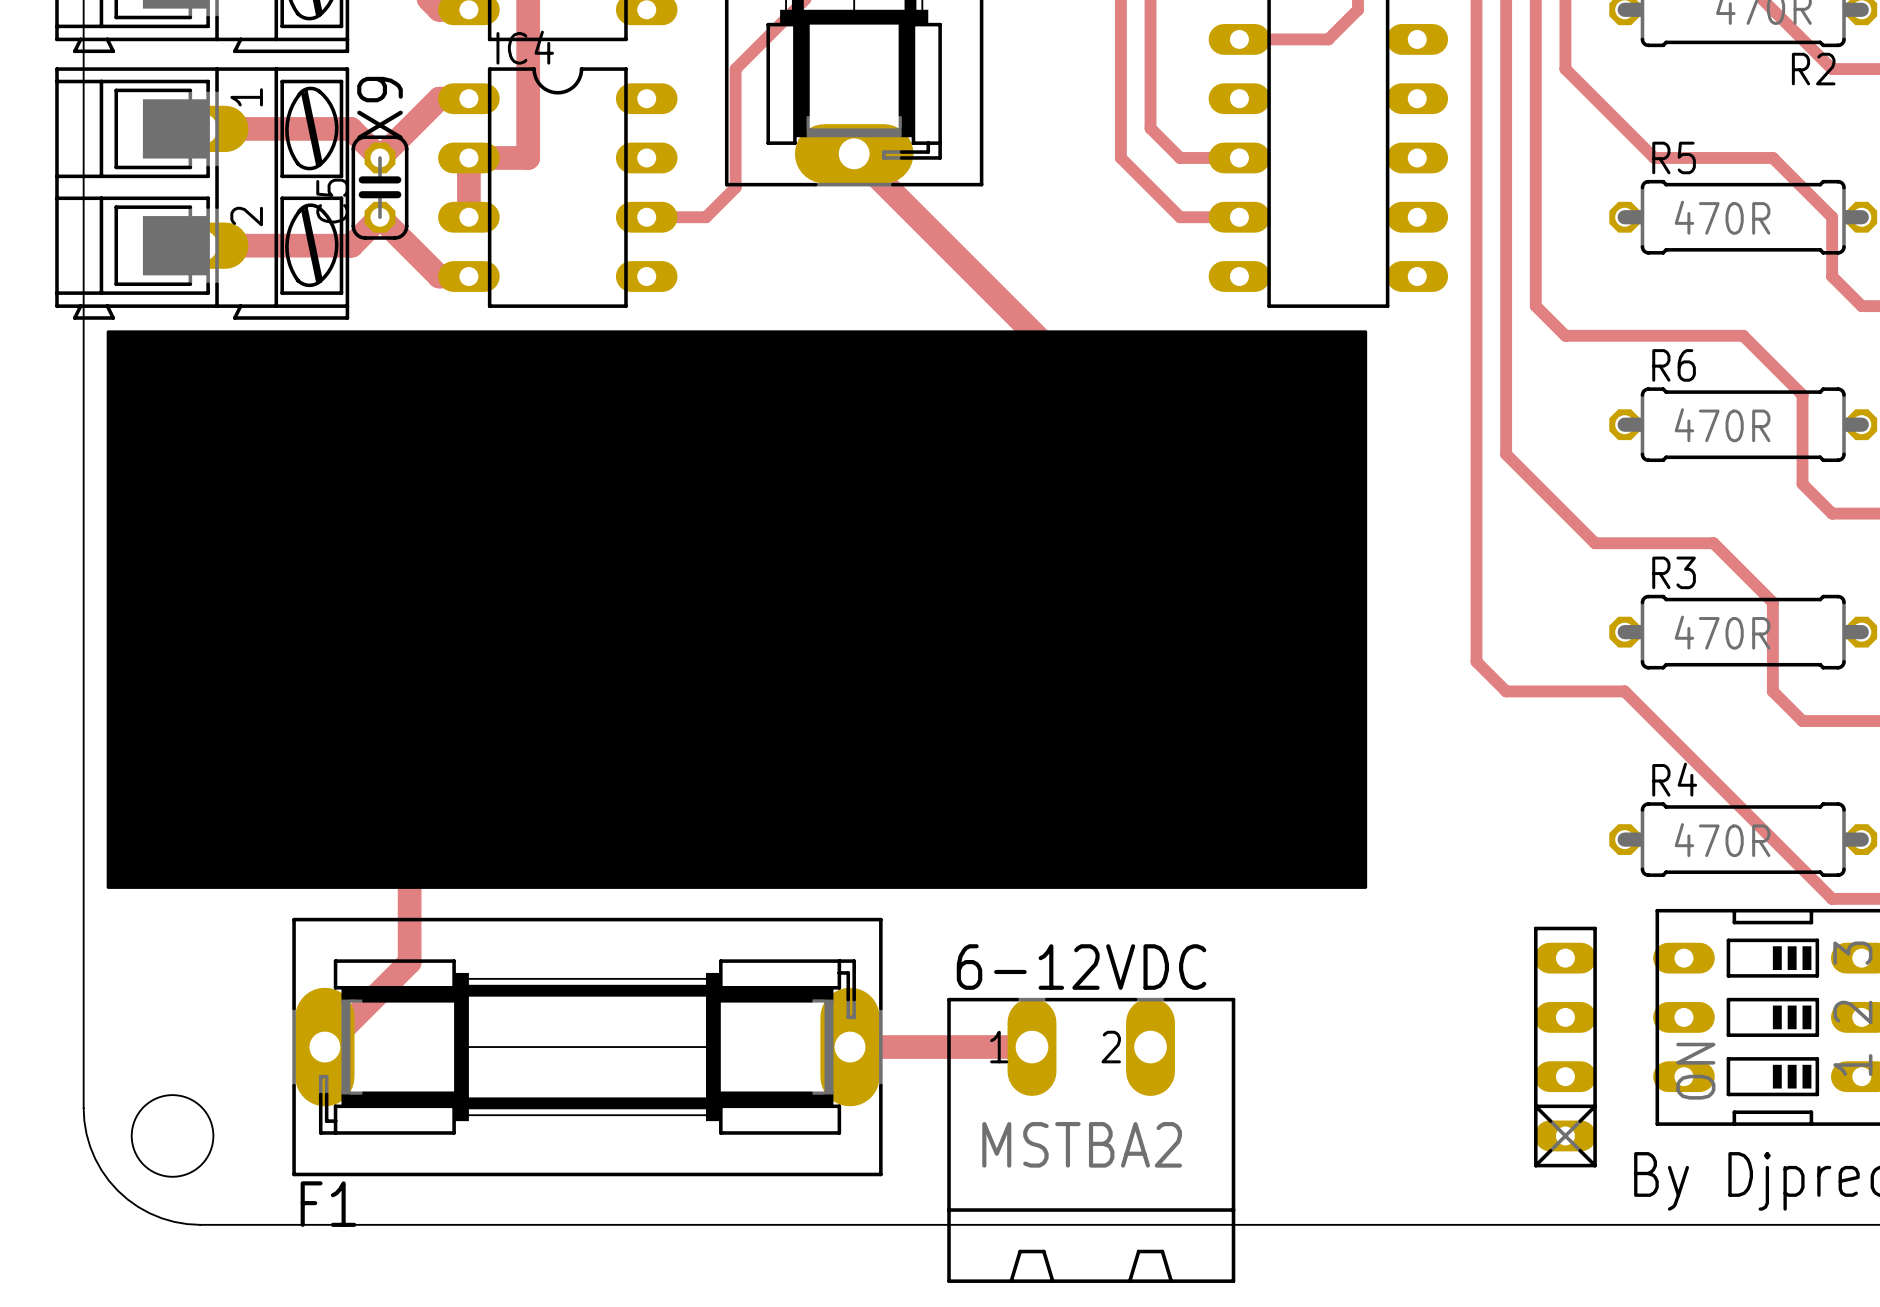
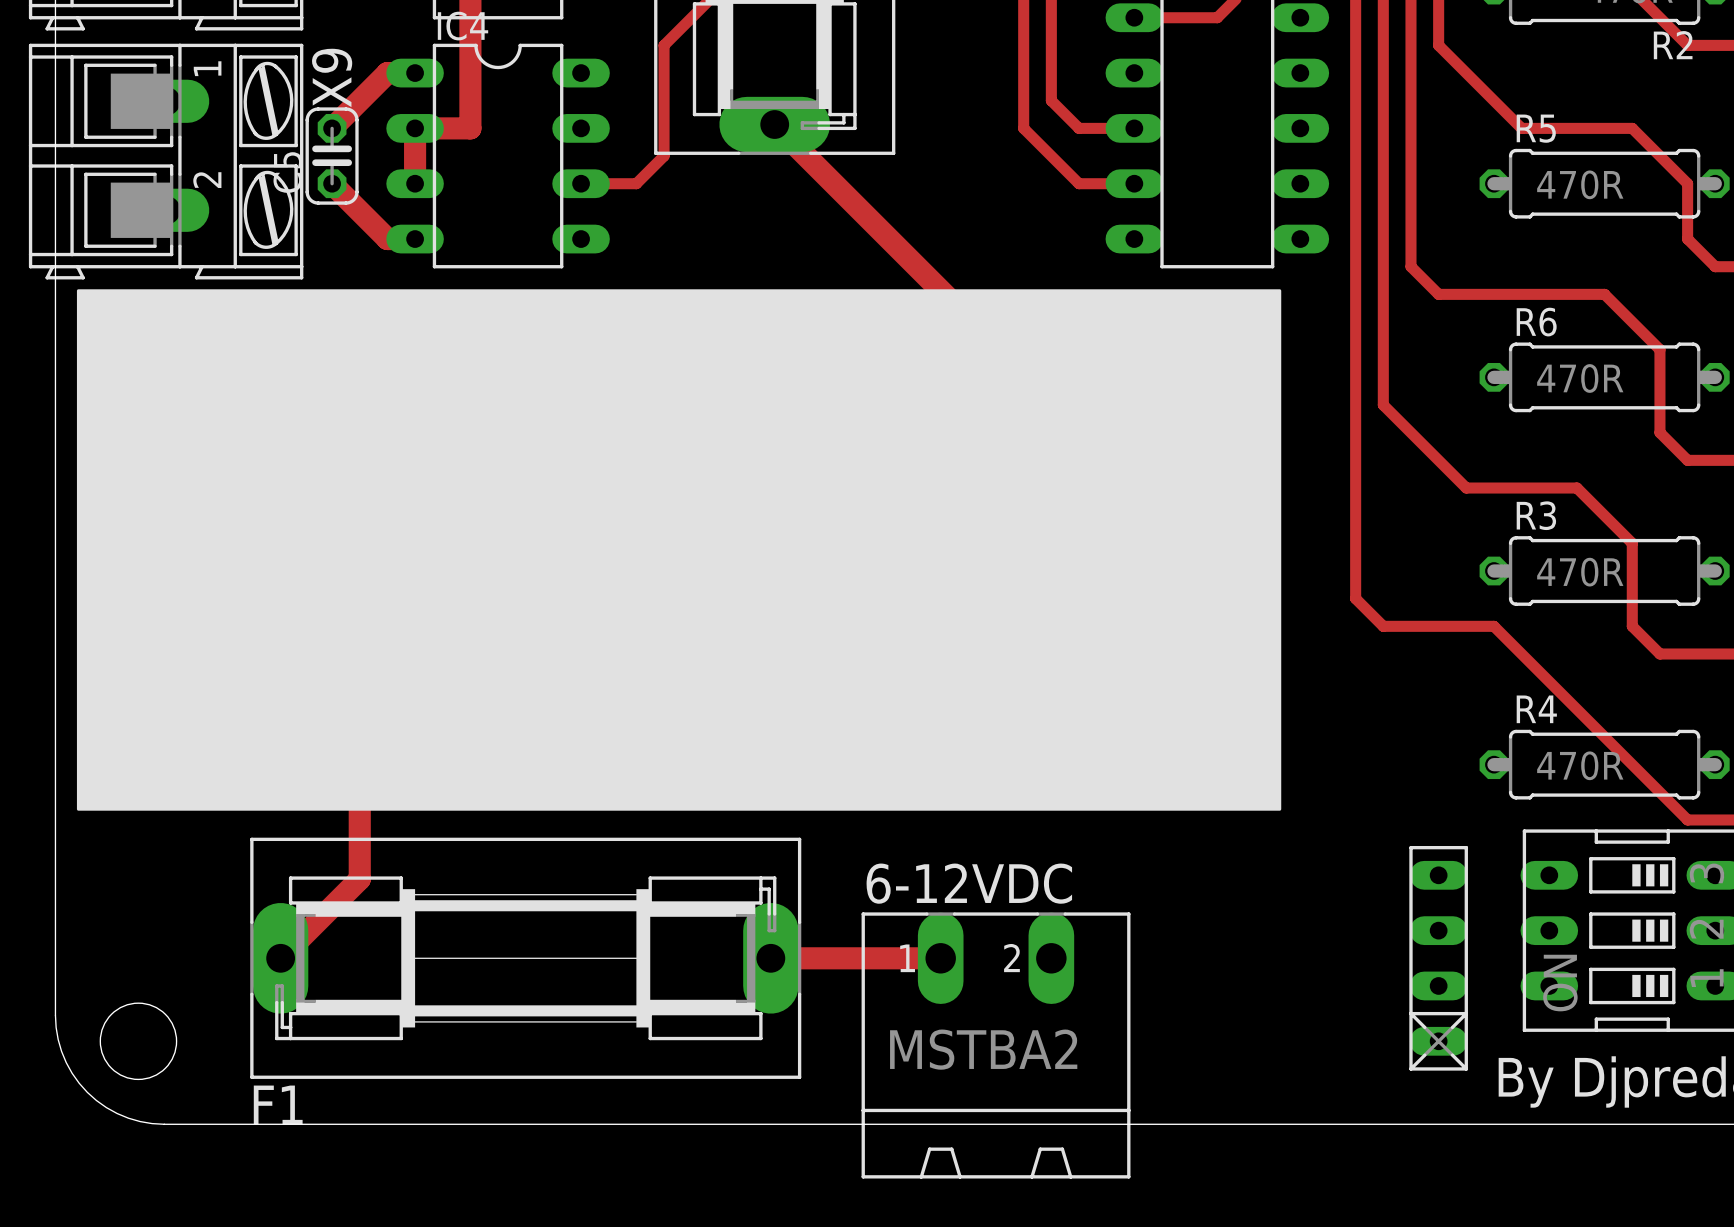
track: (202, 128) (350, 128) (380, 157) -> none
track: (380, 217) (351, 245) (202, 245) -> none
part footprint: [106, 330, 1368, 889] -> [76, 289, 1282, 811]

